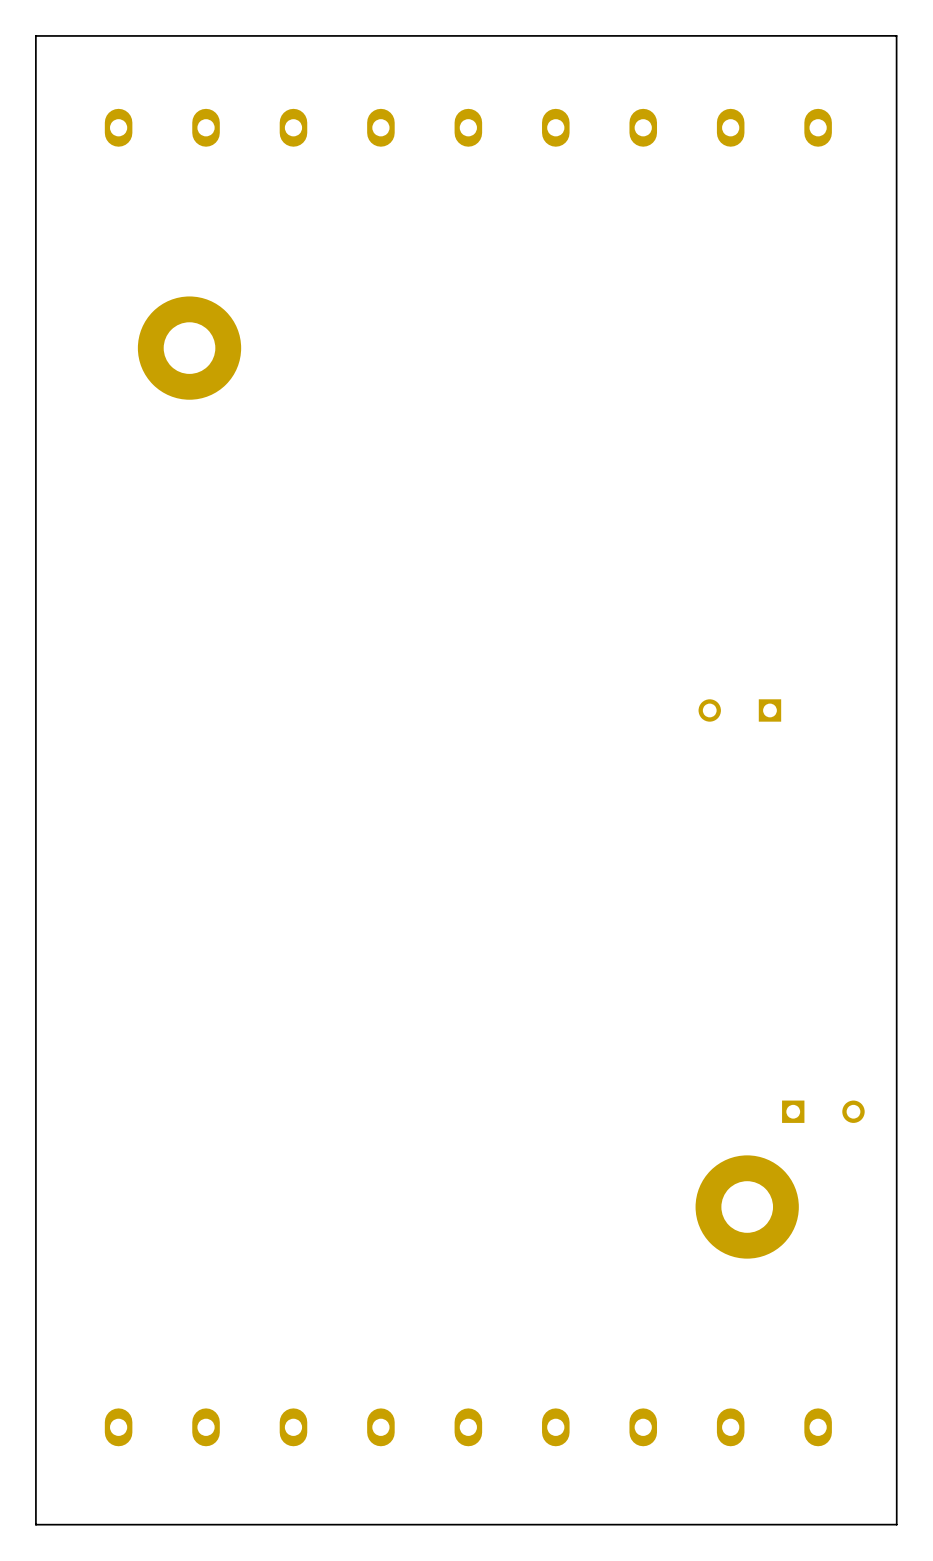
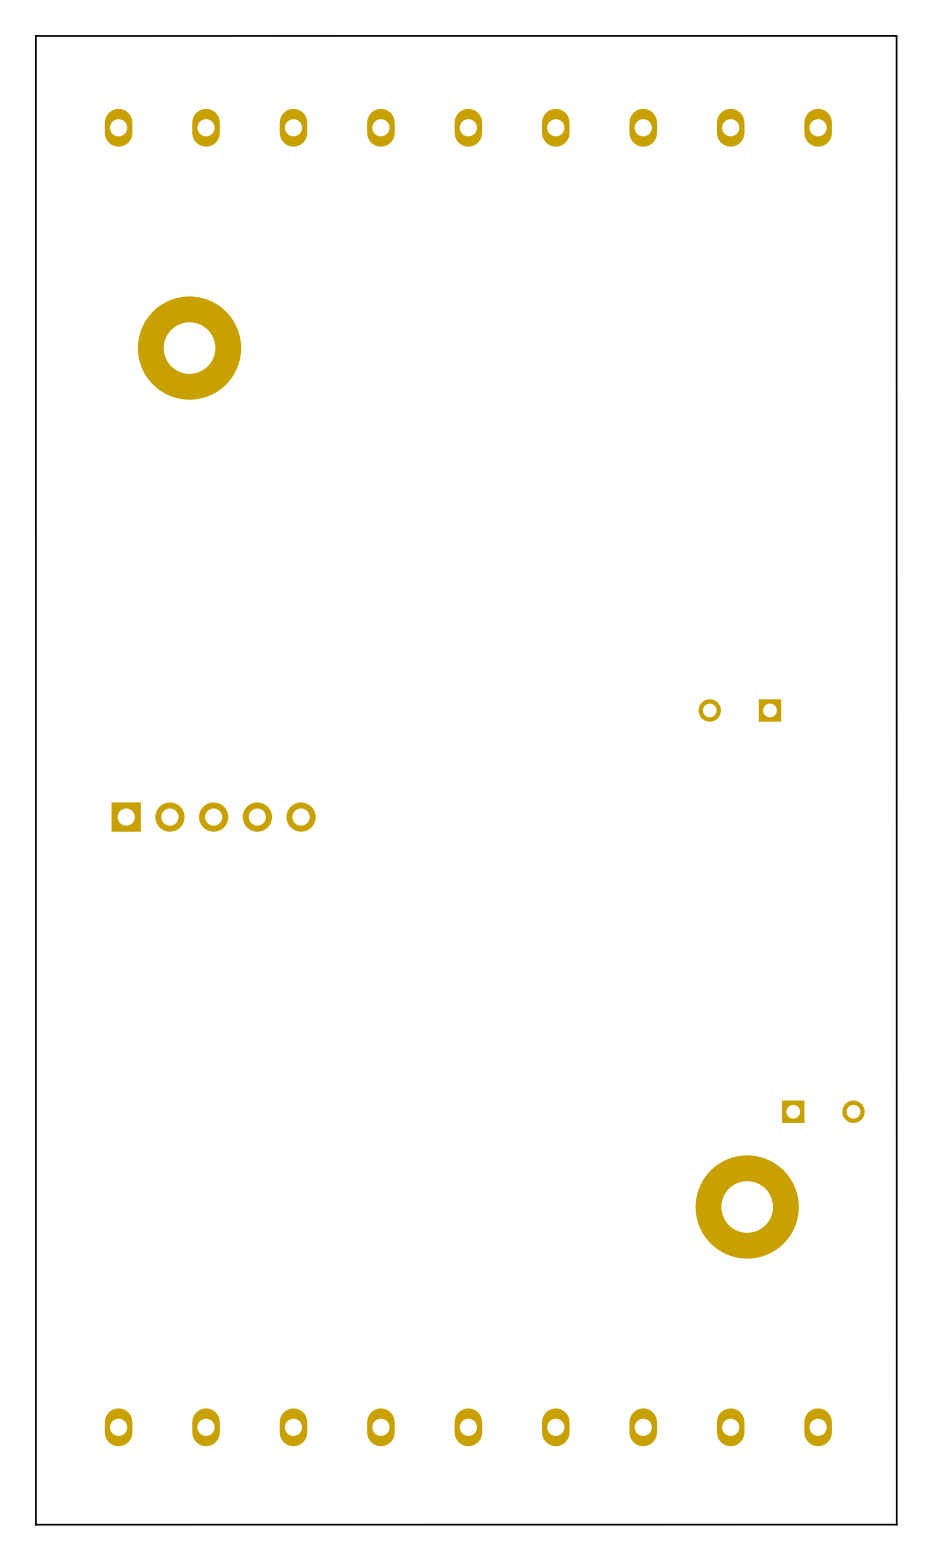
part: none -> (213, 817)

